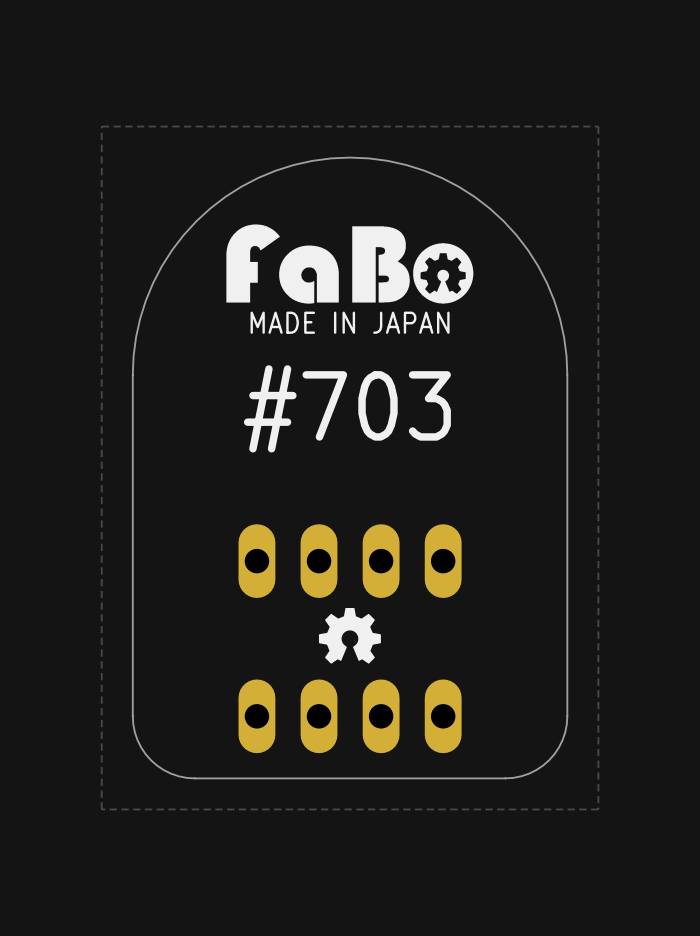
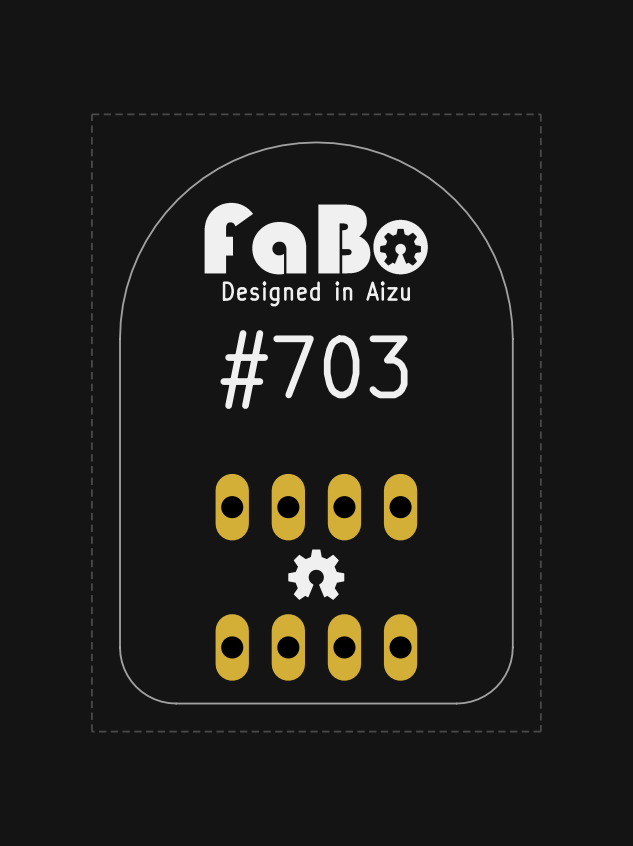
text: MADE IN JAPAN (350, 322) -> Designed in Aizu (316, 293)

